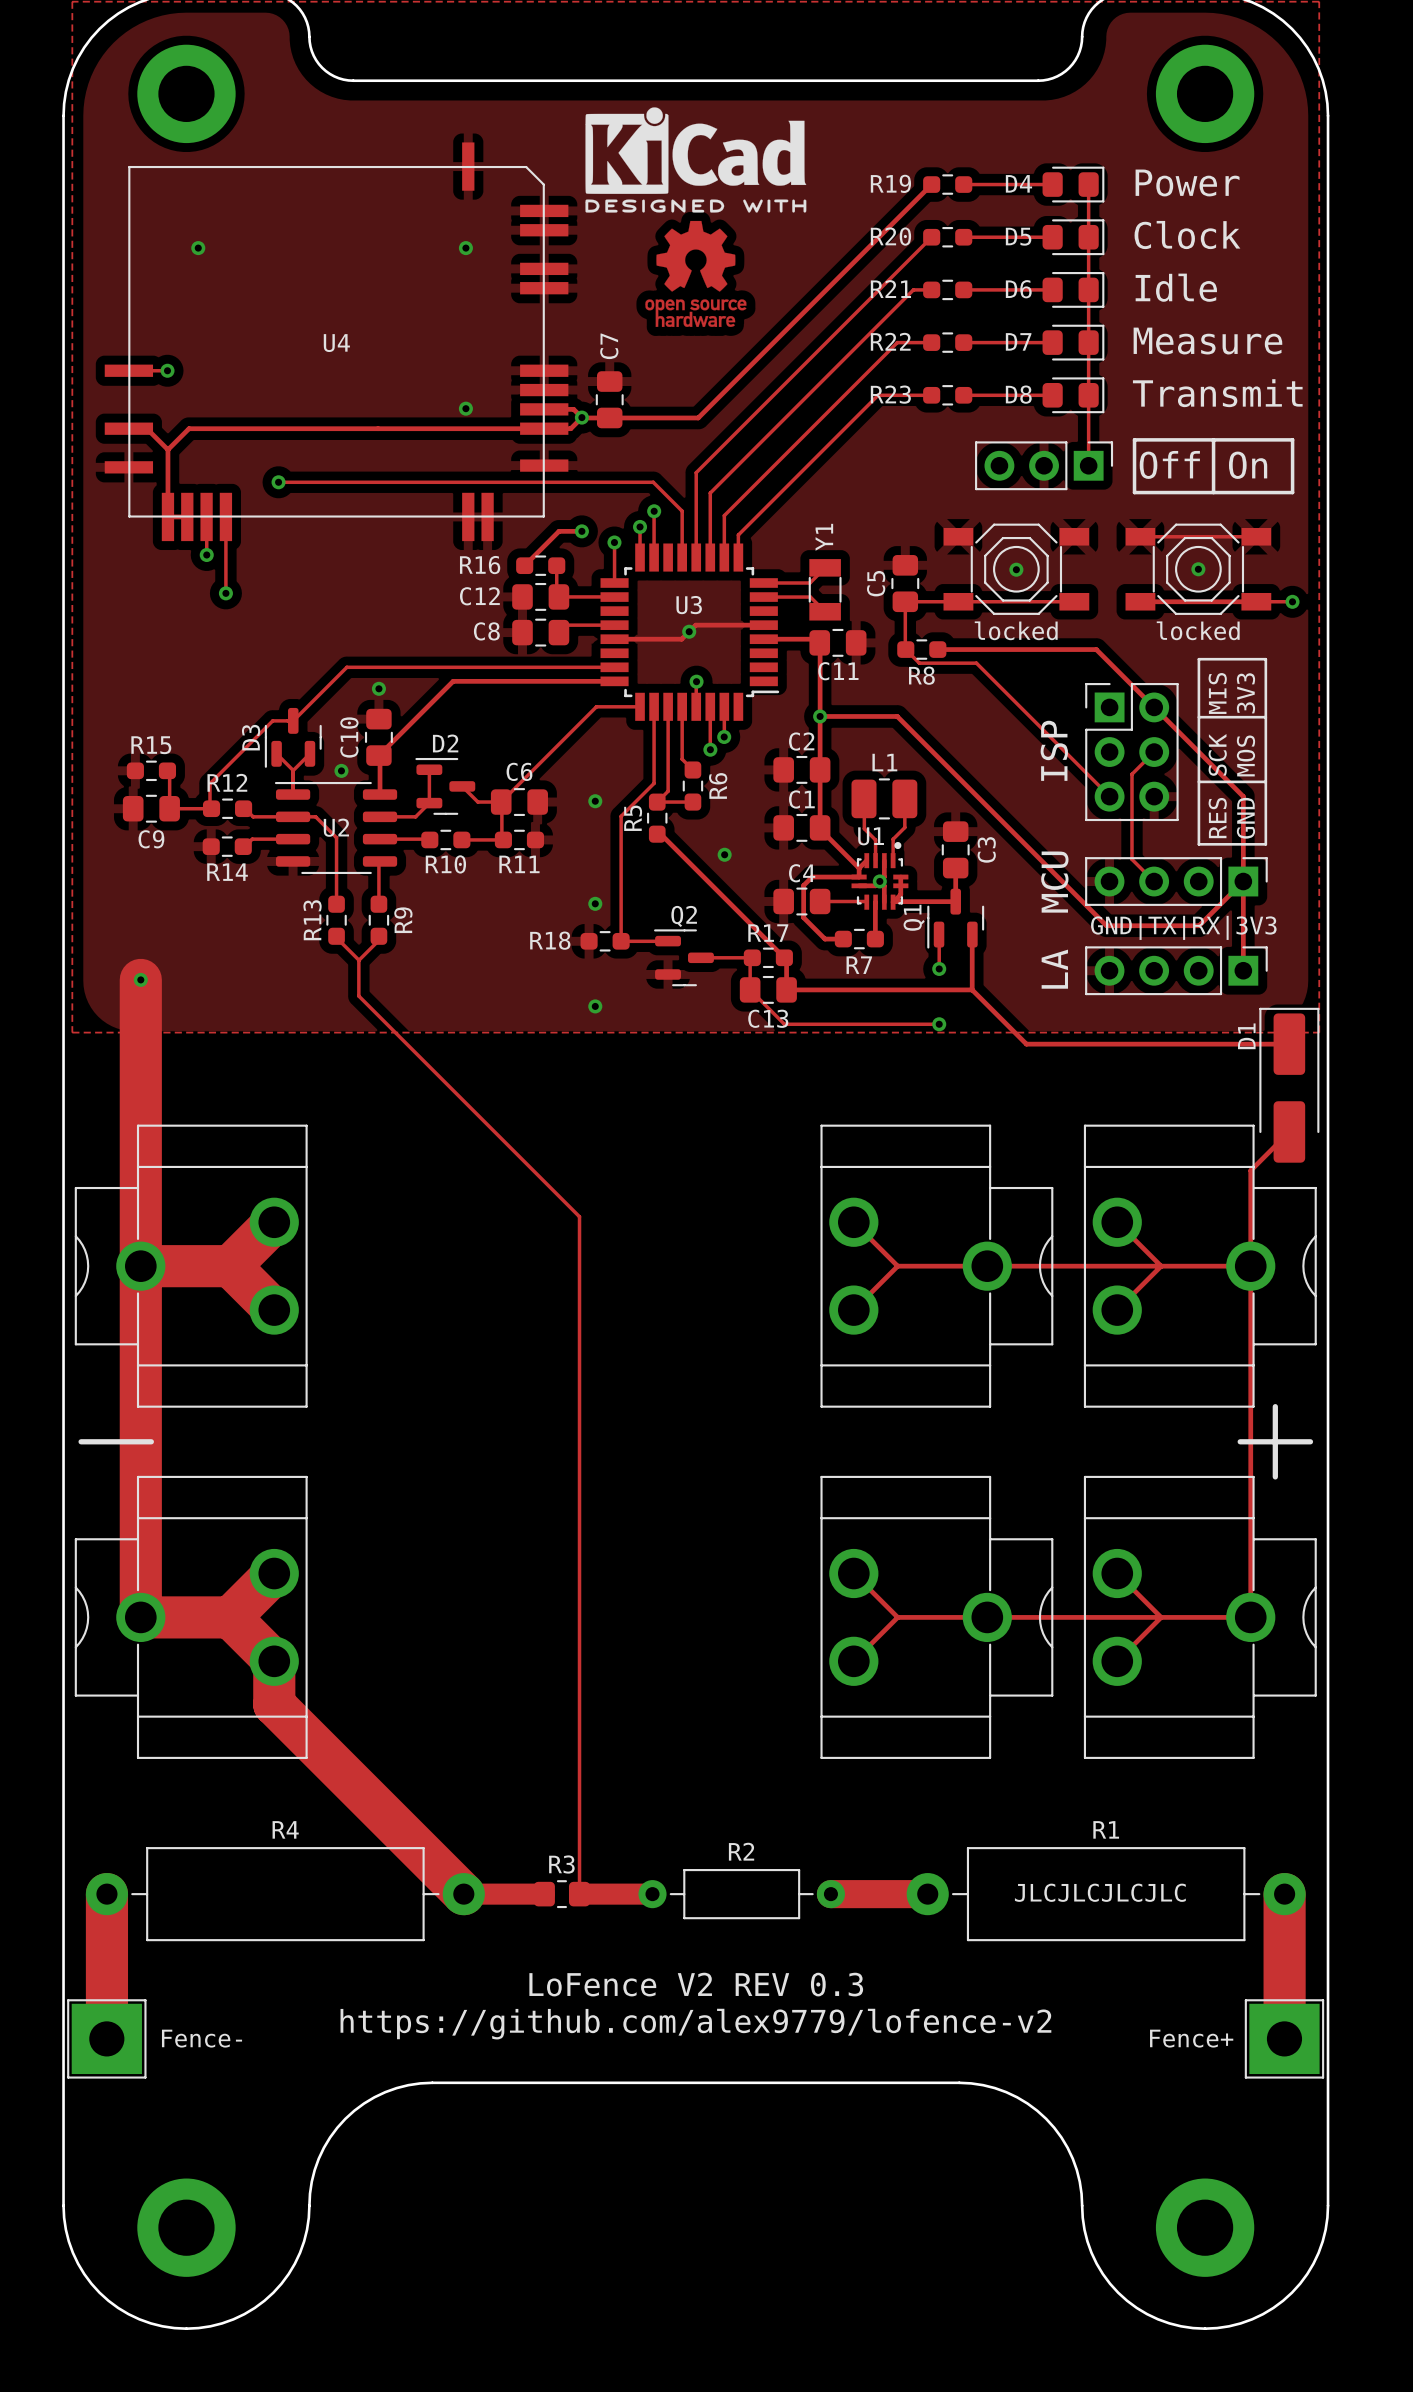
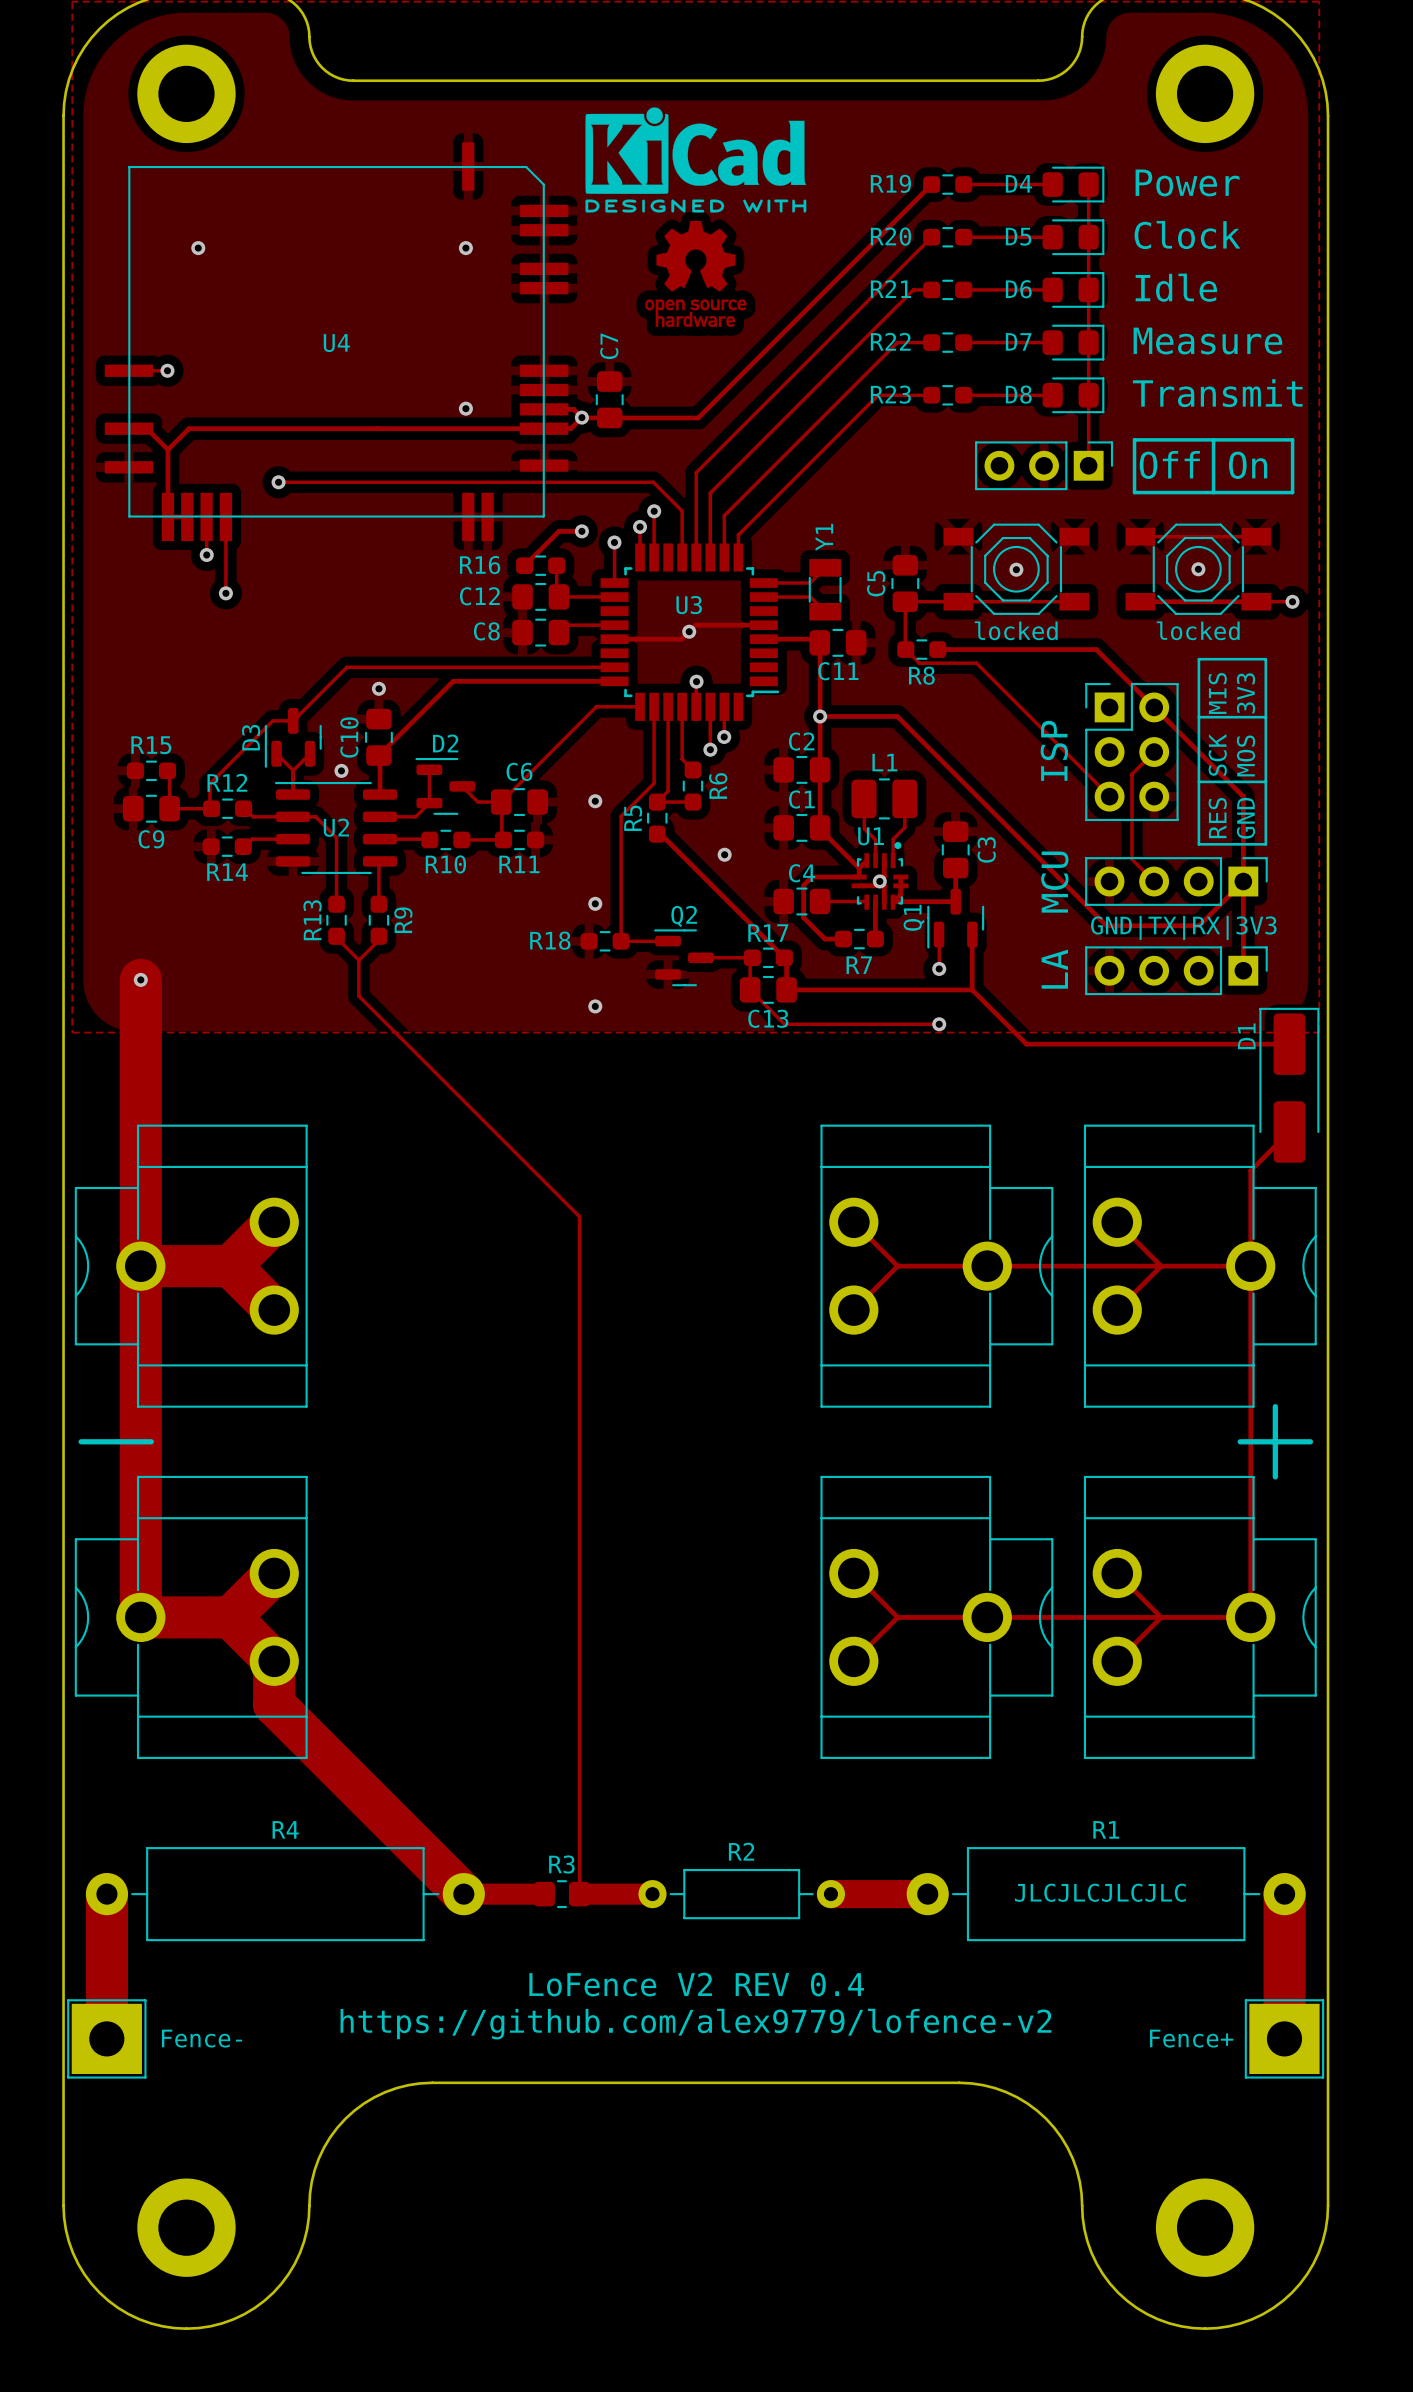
text: LoFence V2 REV 0.3 (696, 1984) -> LoFence V2 REV 0.4 (696, 1984)

